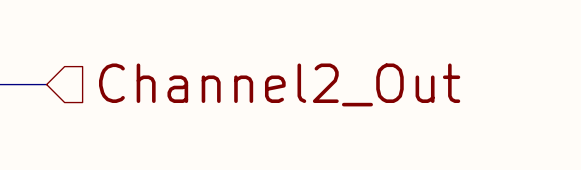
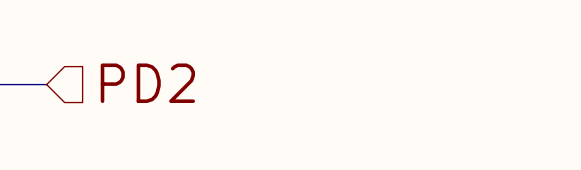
hierarchical label: Channel2_Out (279, 84) -> PD2 (147, 83)

